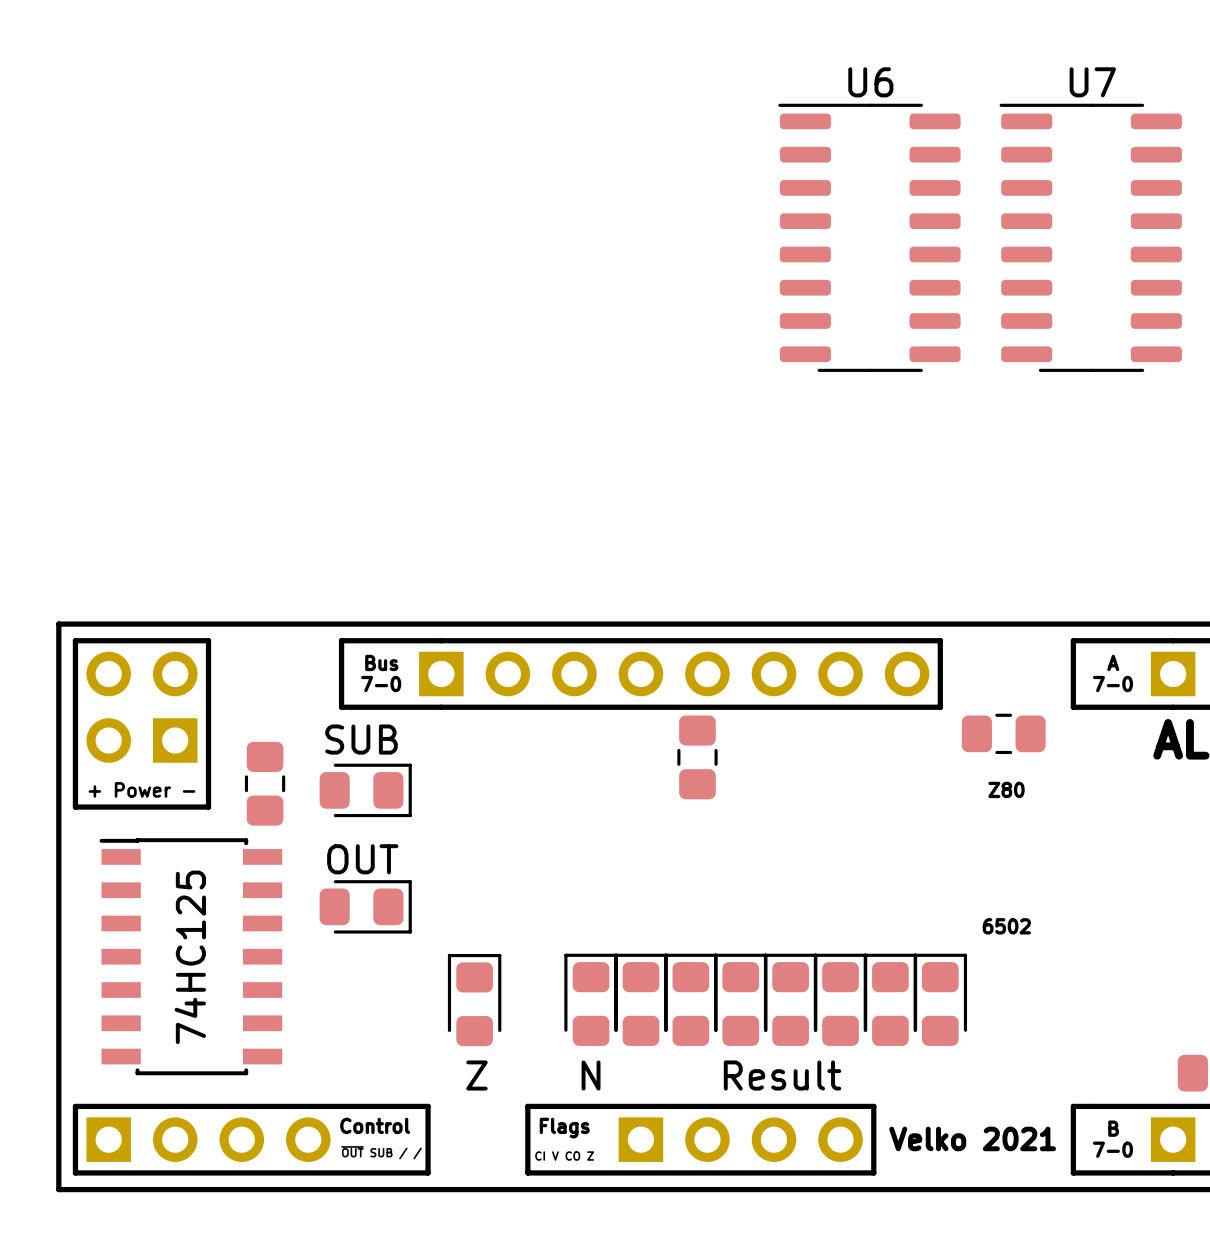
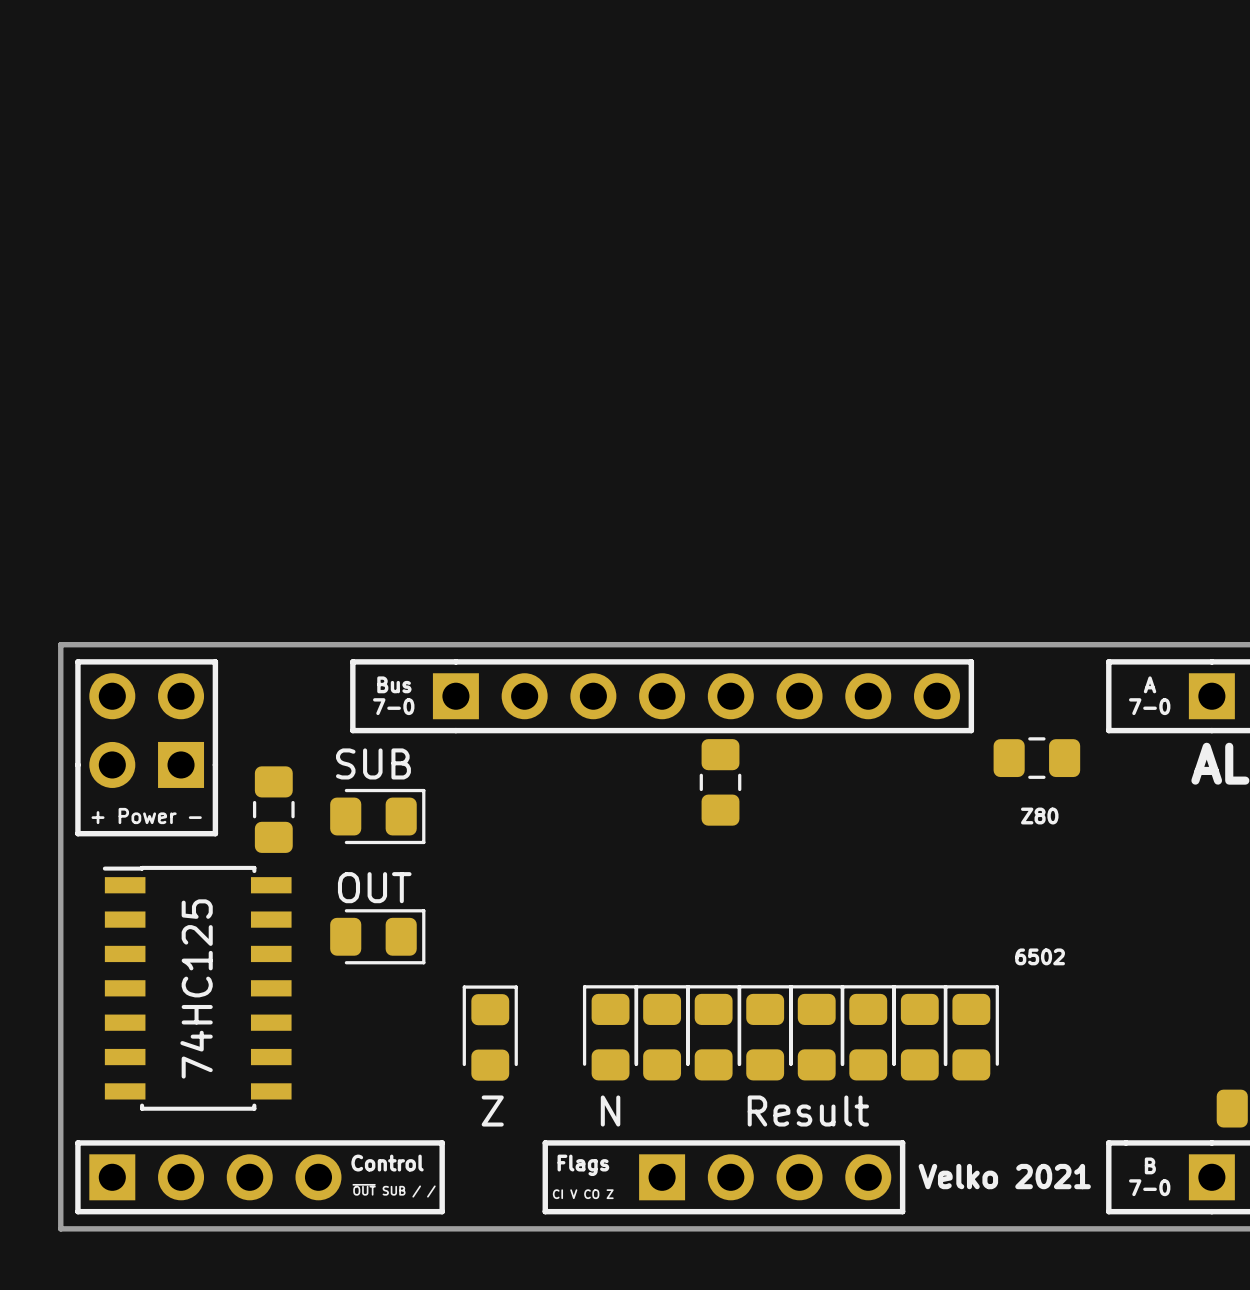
U6: (869, 237) -> none
U7: (1090, 237) -> none

